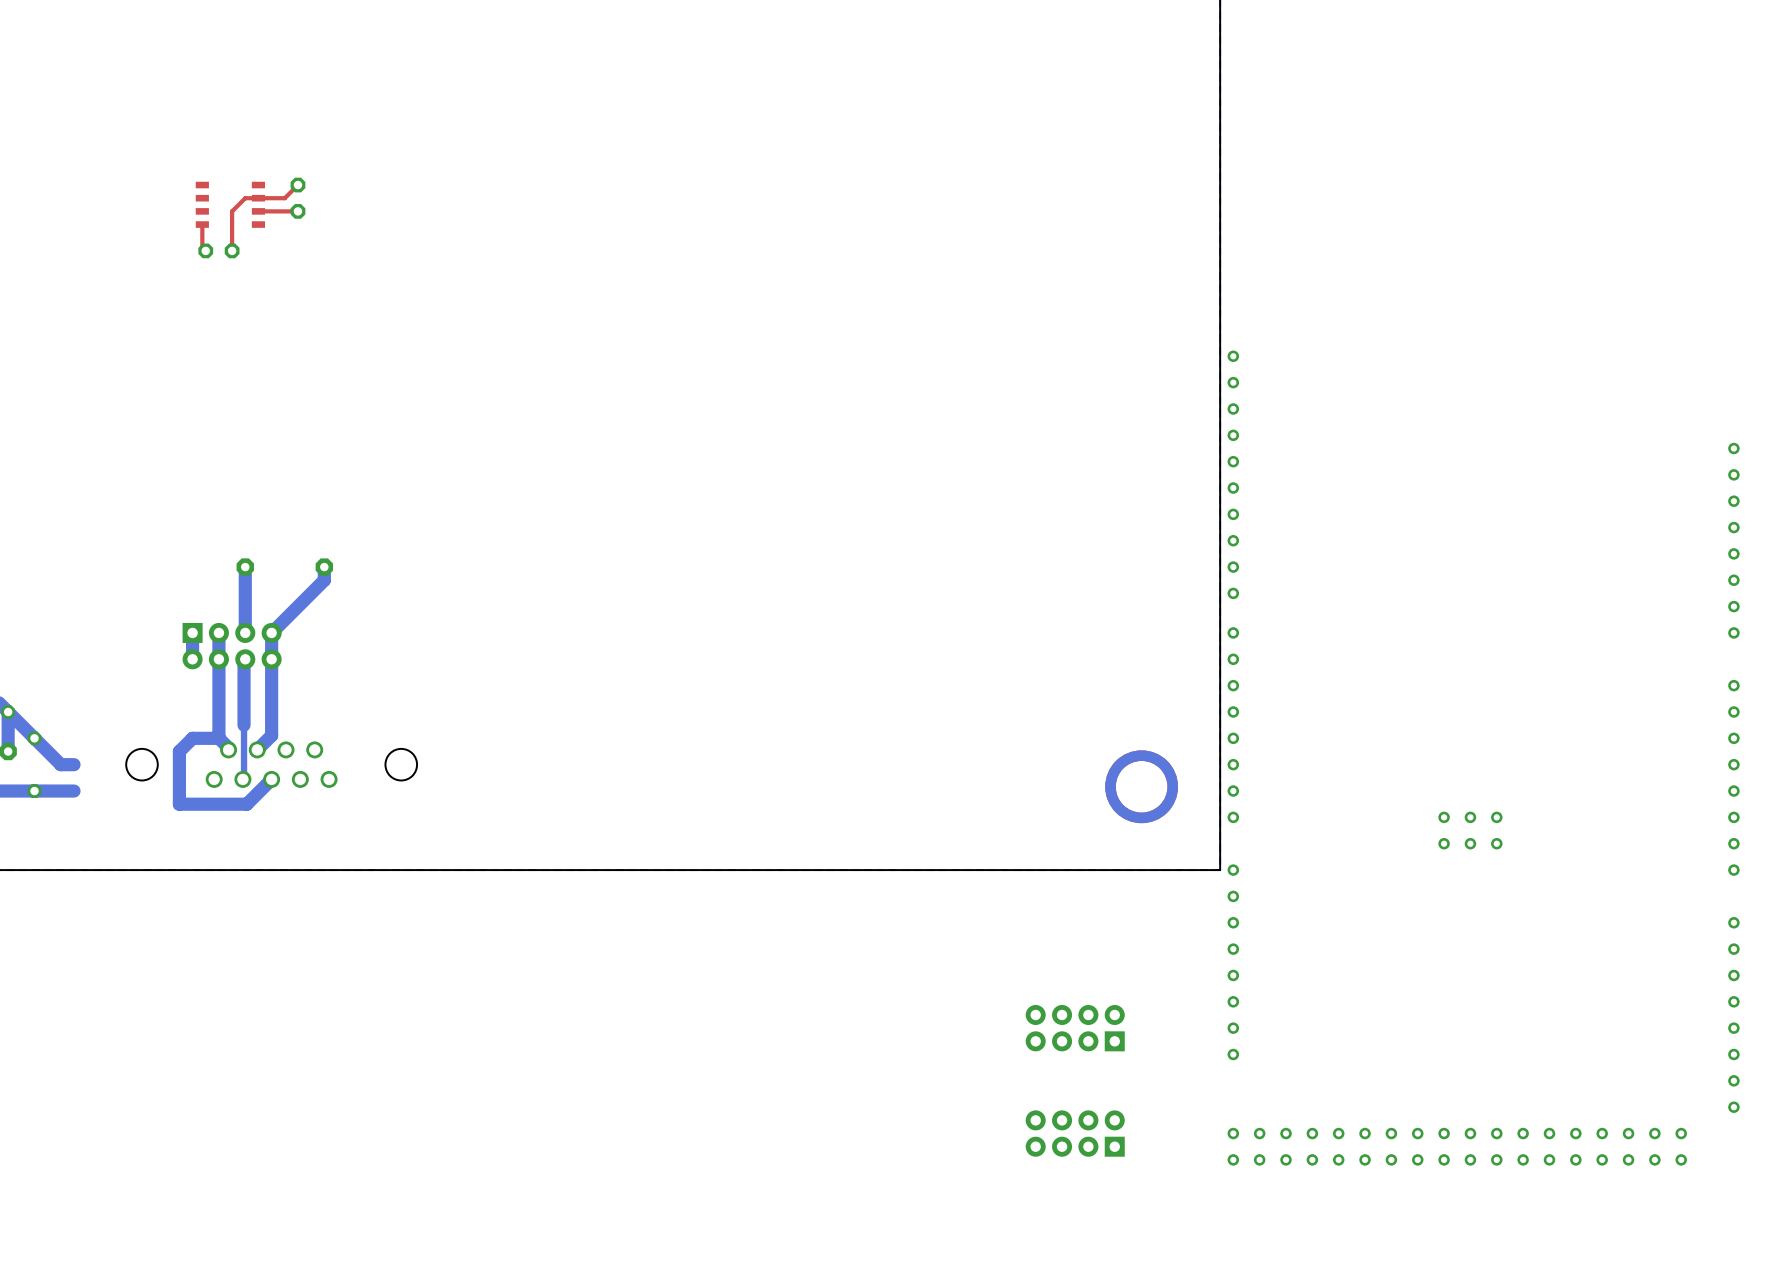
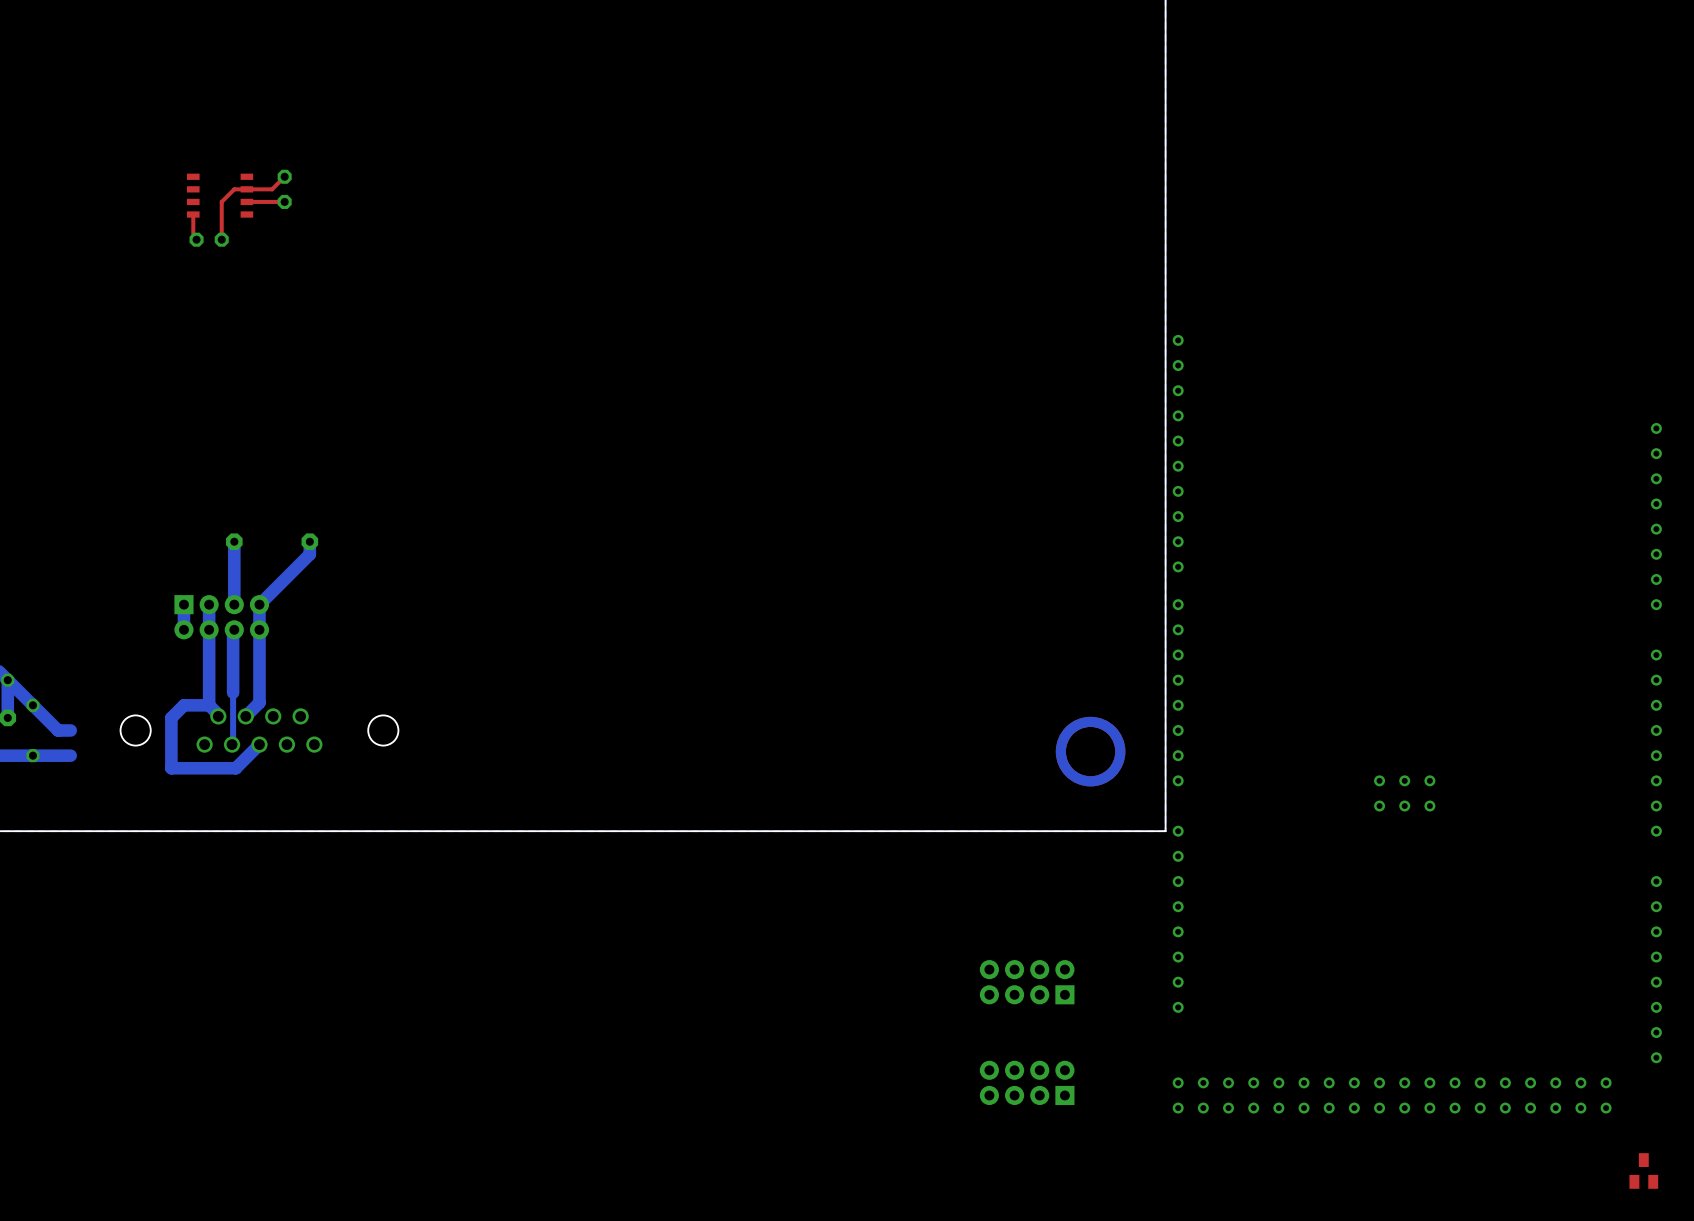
part: none -> (1643, 1170)

